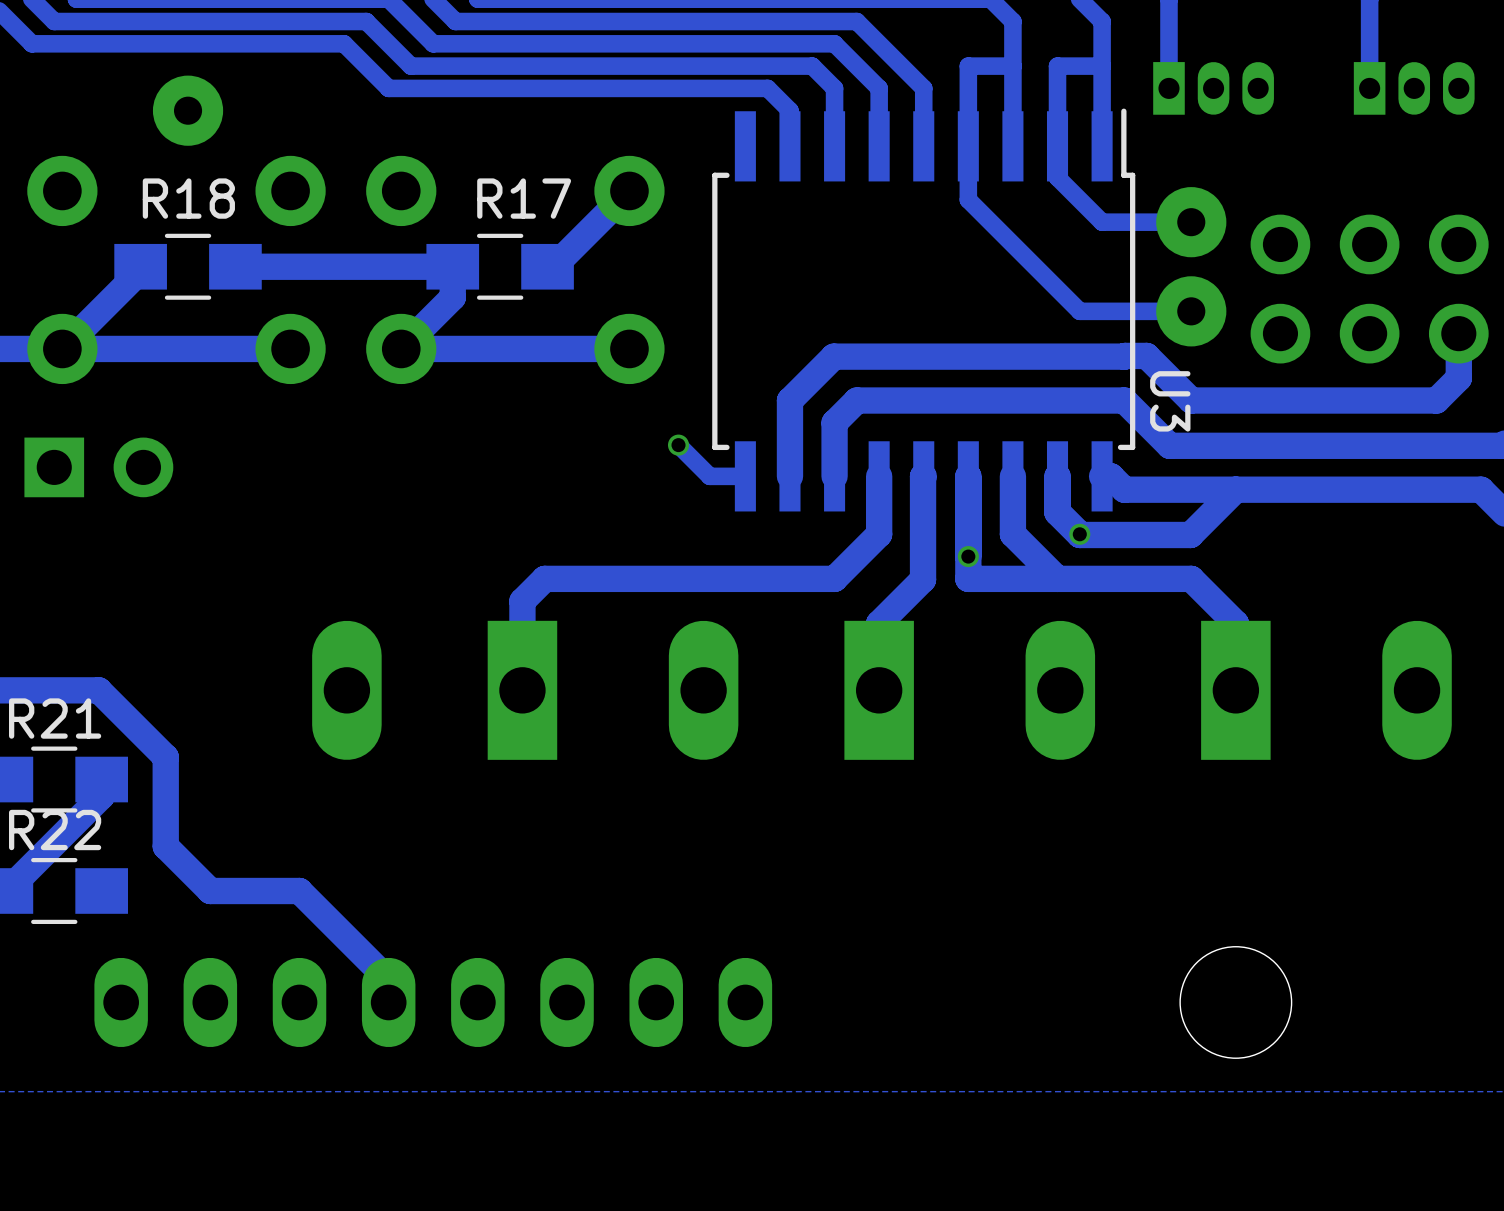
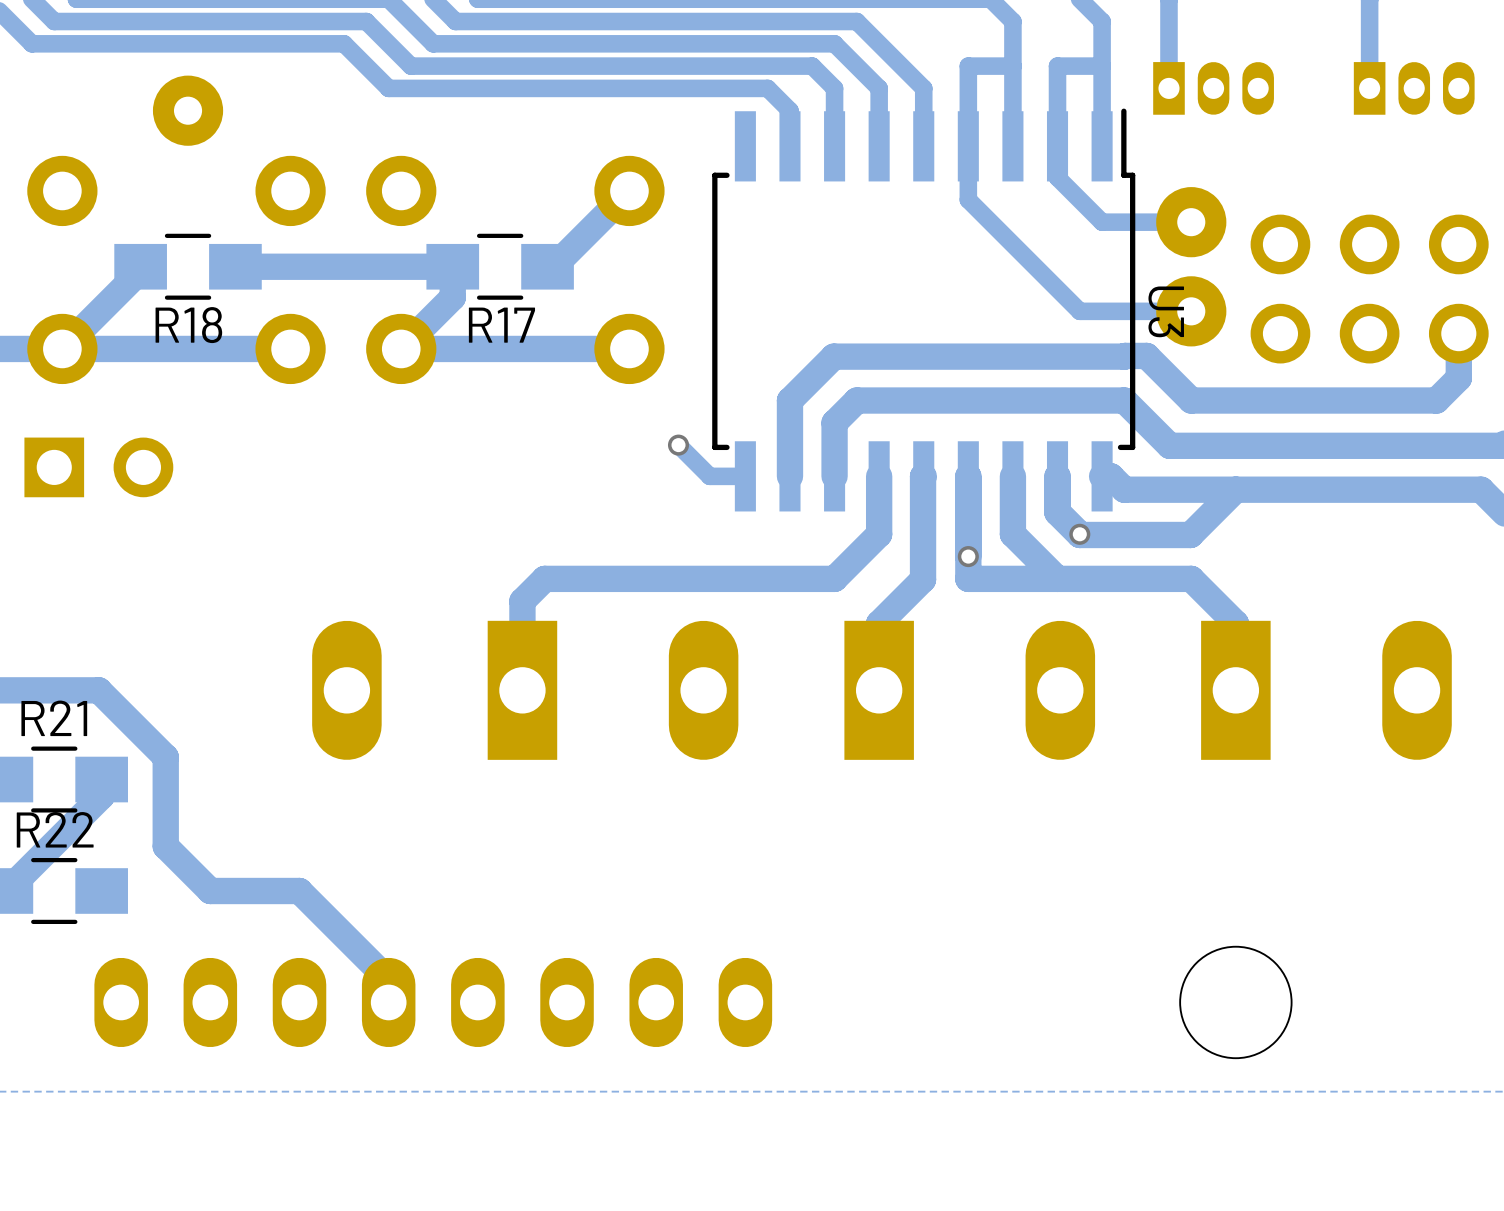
R18 name position: R18 (188, 198) -> R18 (188, 325)
R17 name position: R17 (524, 198) -> R17 (501, 325)
U3 name position: U3 (1170, 401) -> U3 (1166, 311)

